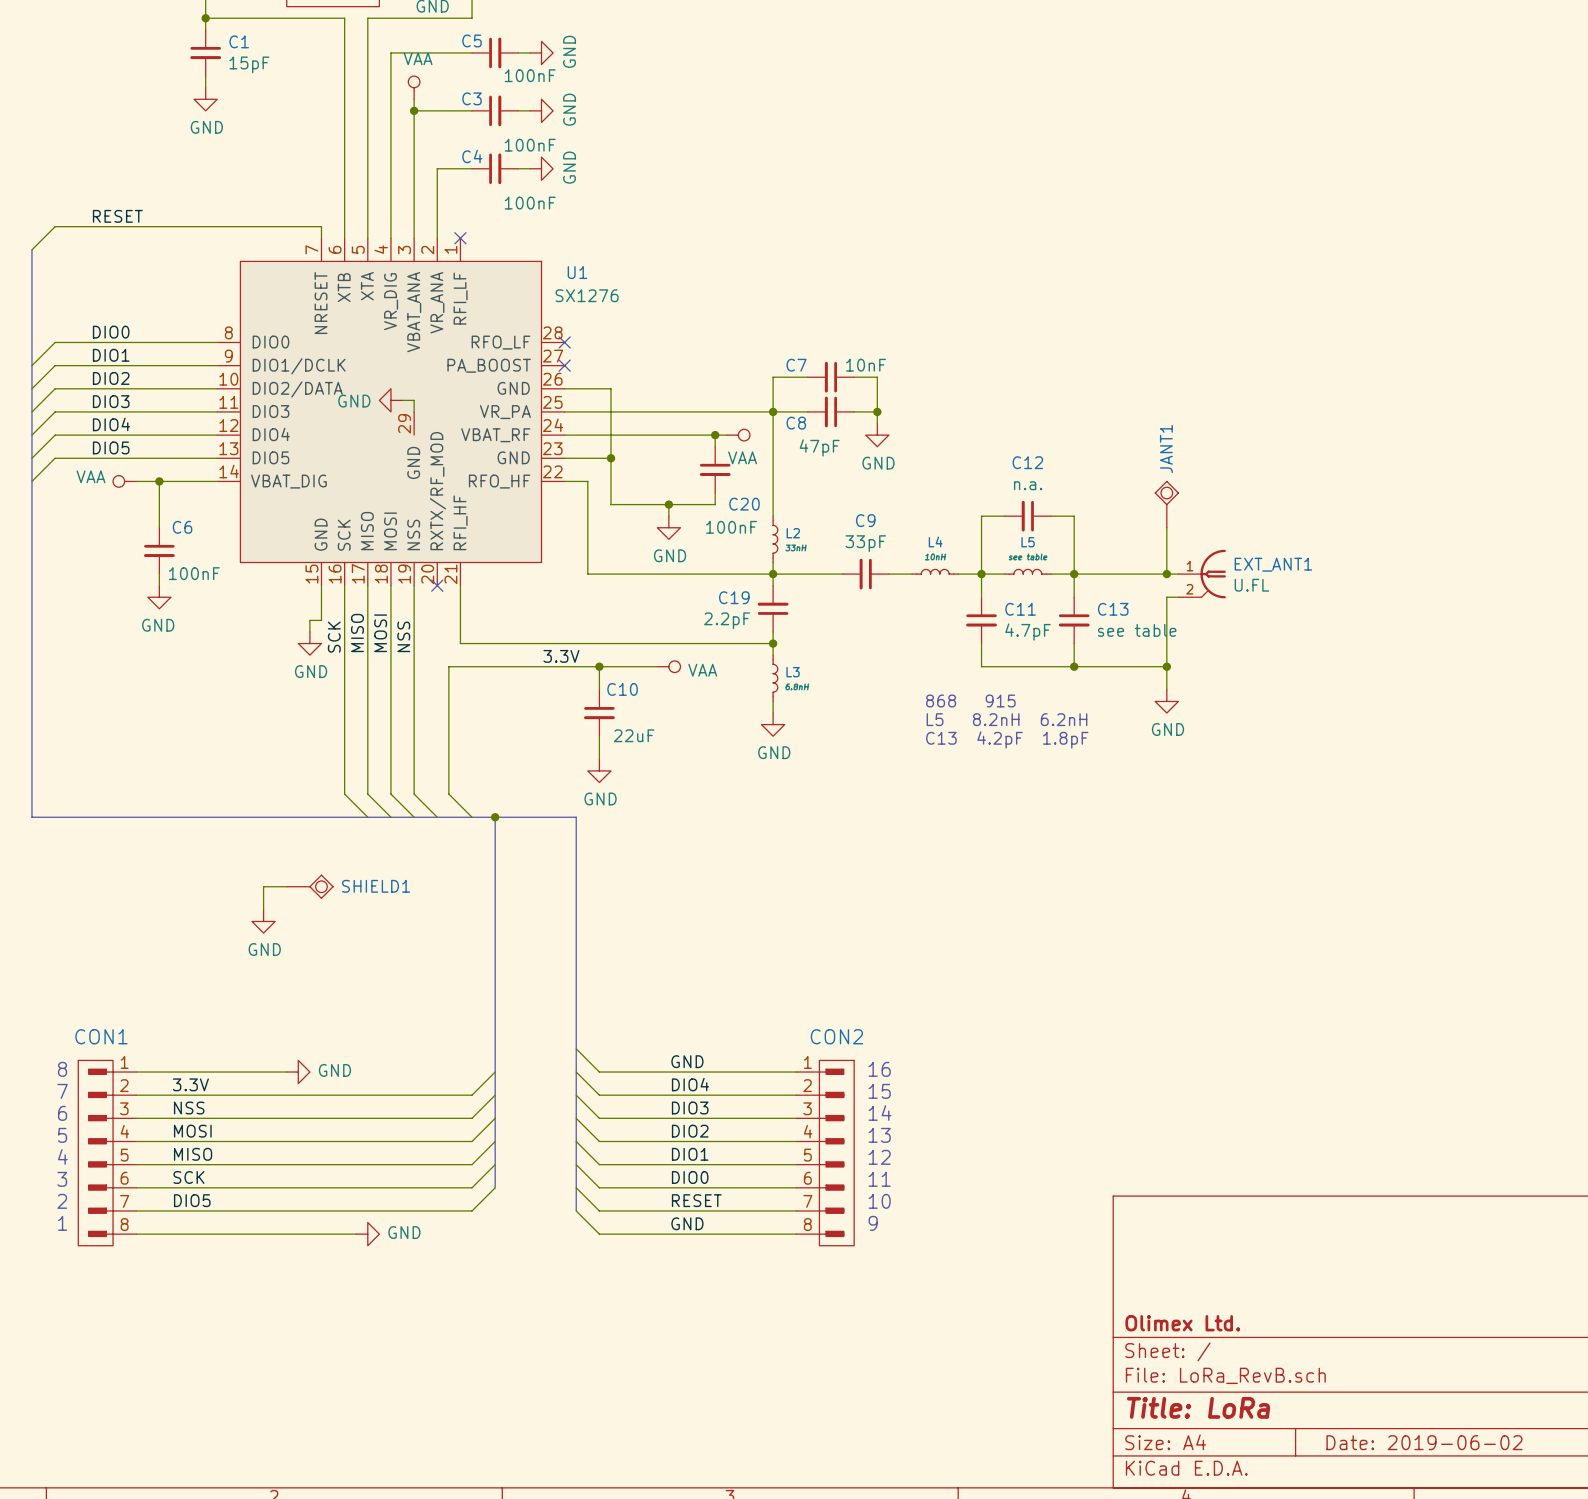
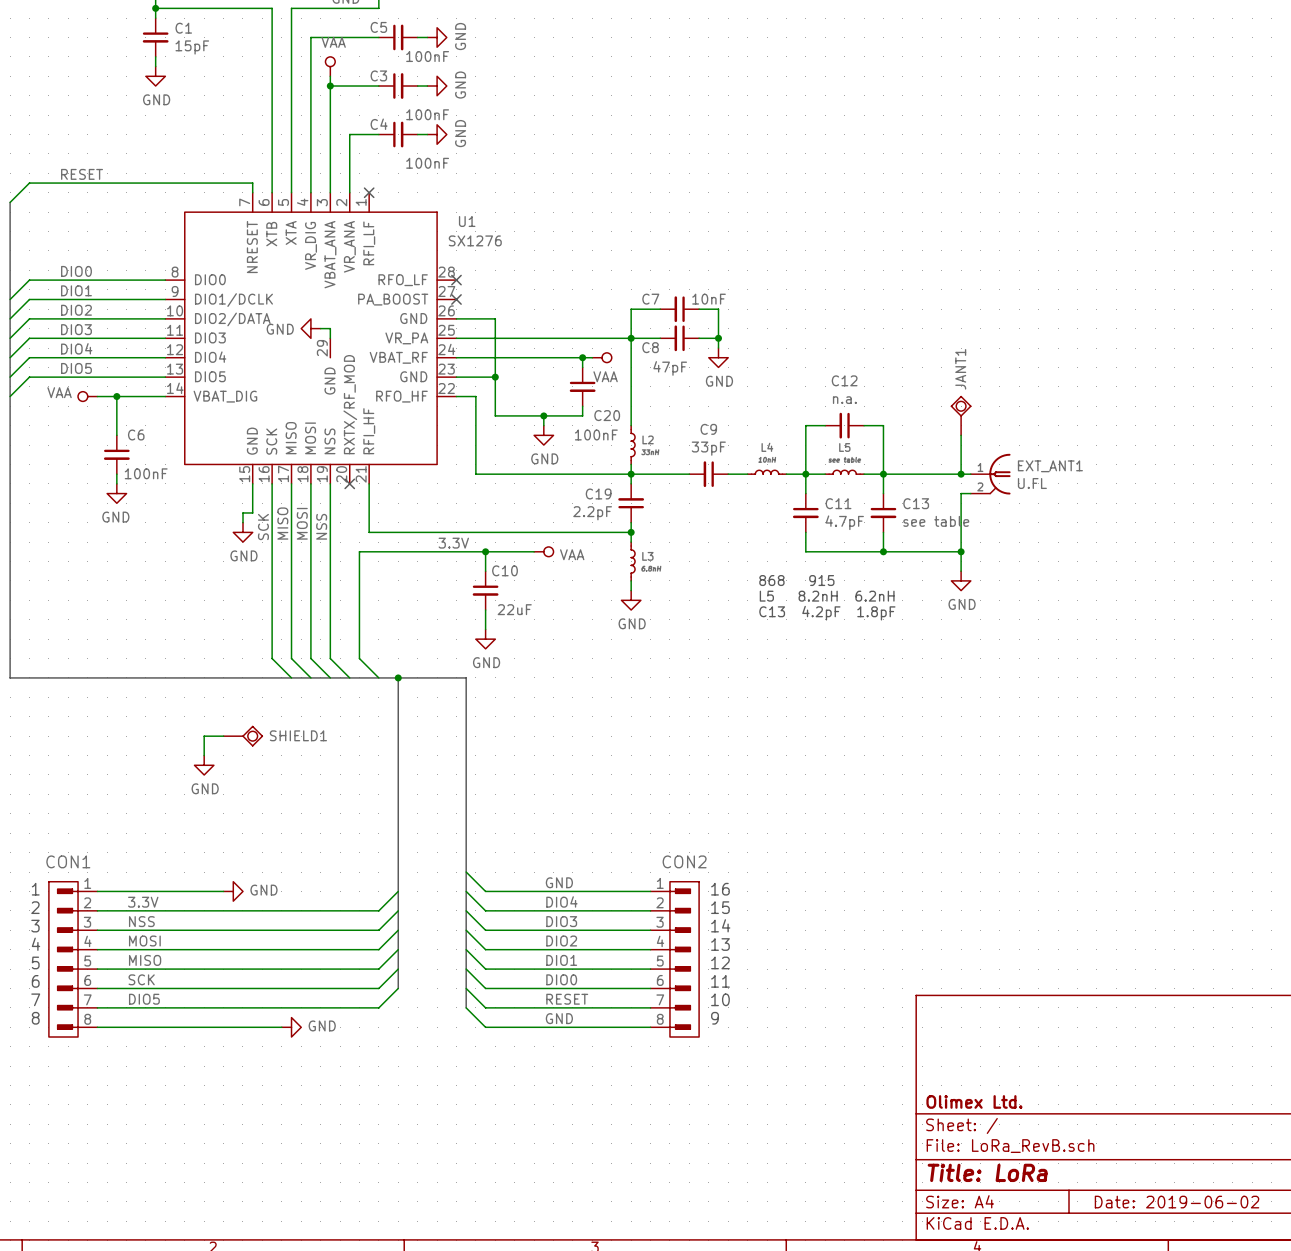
text: 8 (62, 1069) -> 1 (35, 889)
text: 7 (62, 1091) -> 2 (35, 907)
text: 6 (62, 1113) -> 3 (35, 926)
text: 5 (62, 1135) -> 4 (36, 944)
text: 4 (62, 1157) -> 5 (35, 962)
text: 3 (62, 1179) -> 6 (35, 981)
text: 2 (62, 1201) -> 7 (35, 999)
text: 1 (62, 1223) -> 8 (35, 1018)

